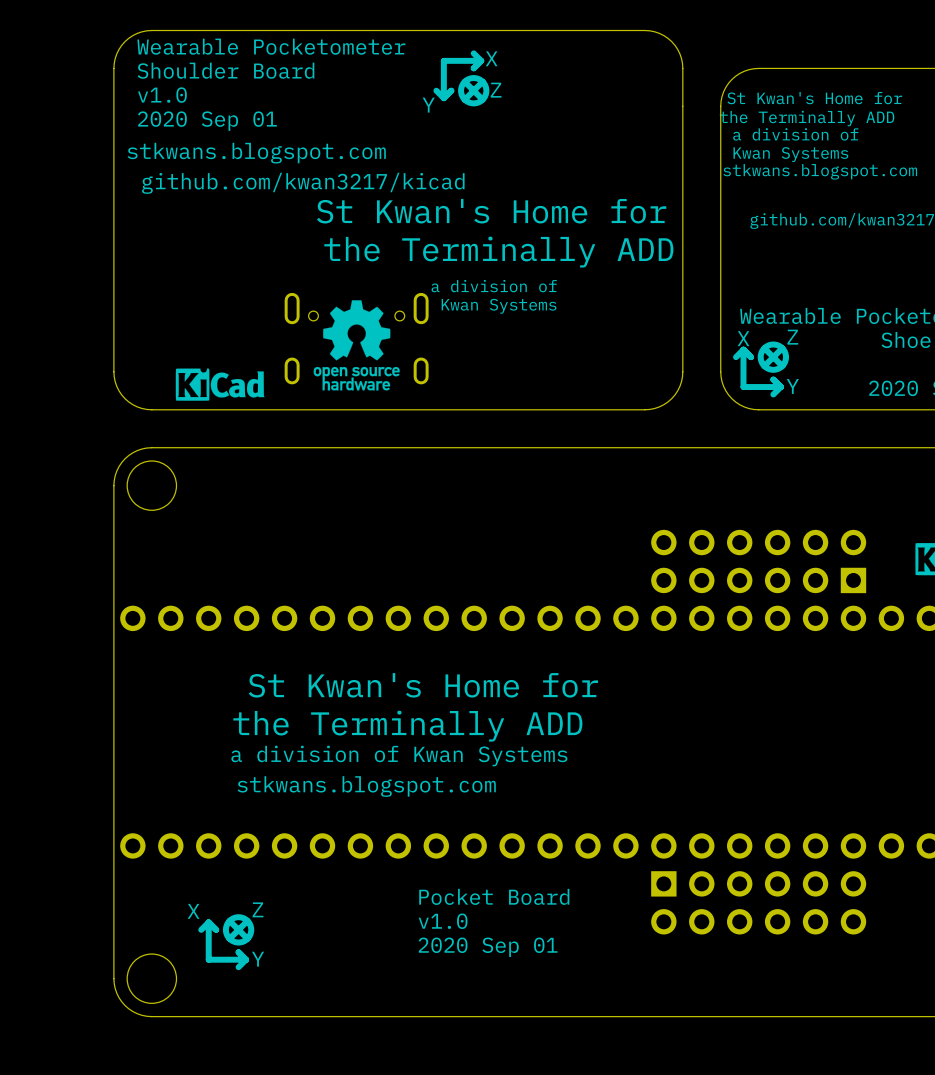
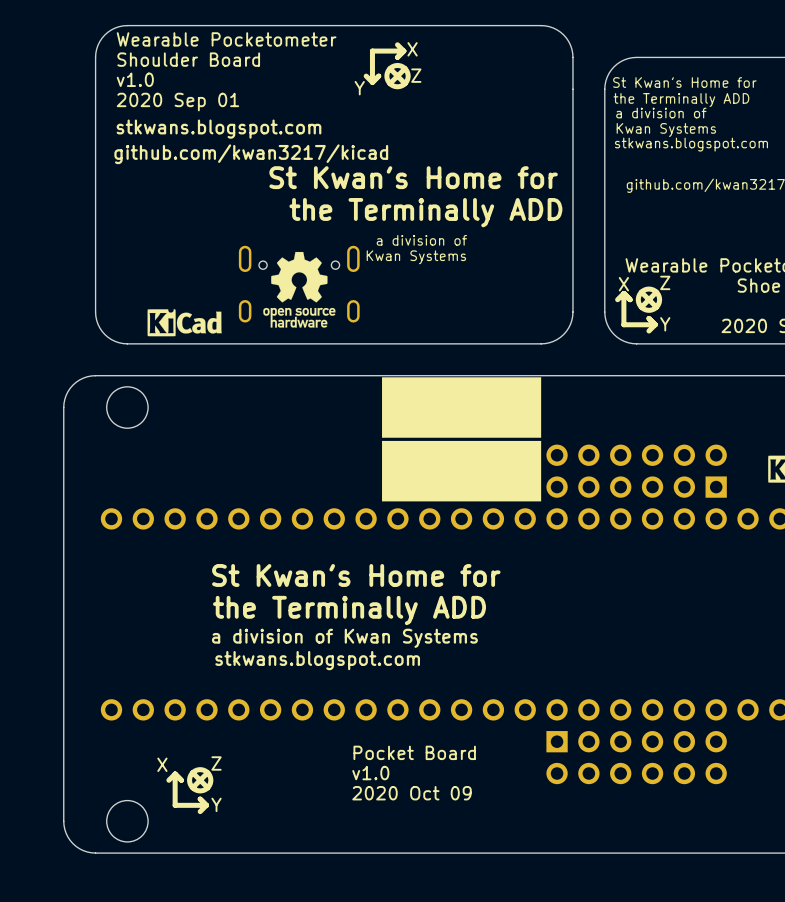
board edge: (151, 447) (137, 450) (125, 458) (116, 471) (113, 485) (114, 983) (116, 993) (125, 1005) (137, 1013) (151, 1016) -> (127, 375) (91, 375) (79, 379) (68, 391) (63, 407) (64, 825) (70, 840) (83, 850) (95, 853) (127, 853)
drawing: none -> [382, 377, 542, 502]
drawing shape: [231, 673, 599, 797] -> [211, 564, 501, 671]
text: 2020 Sep 01 (488, 947) -> 2020 Oct 09 (411, 793)

